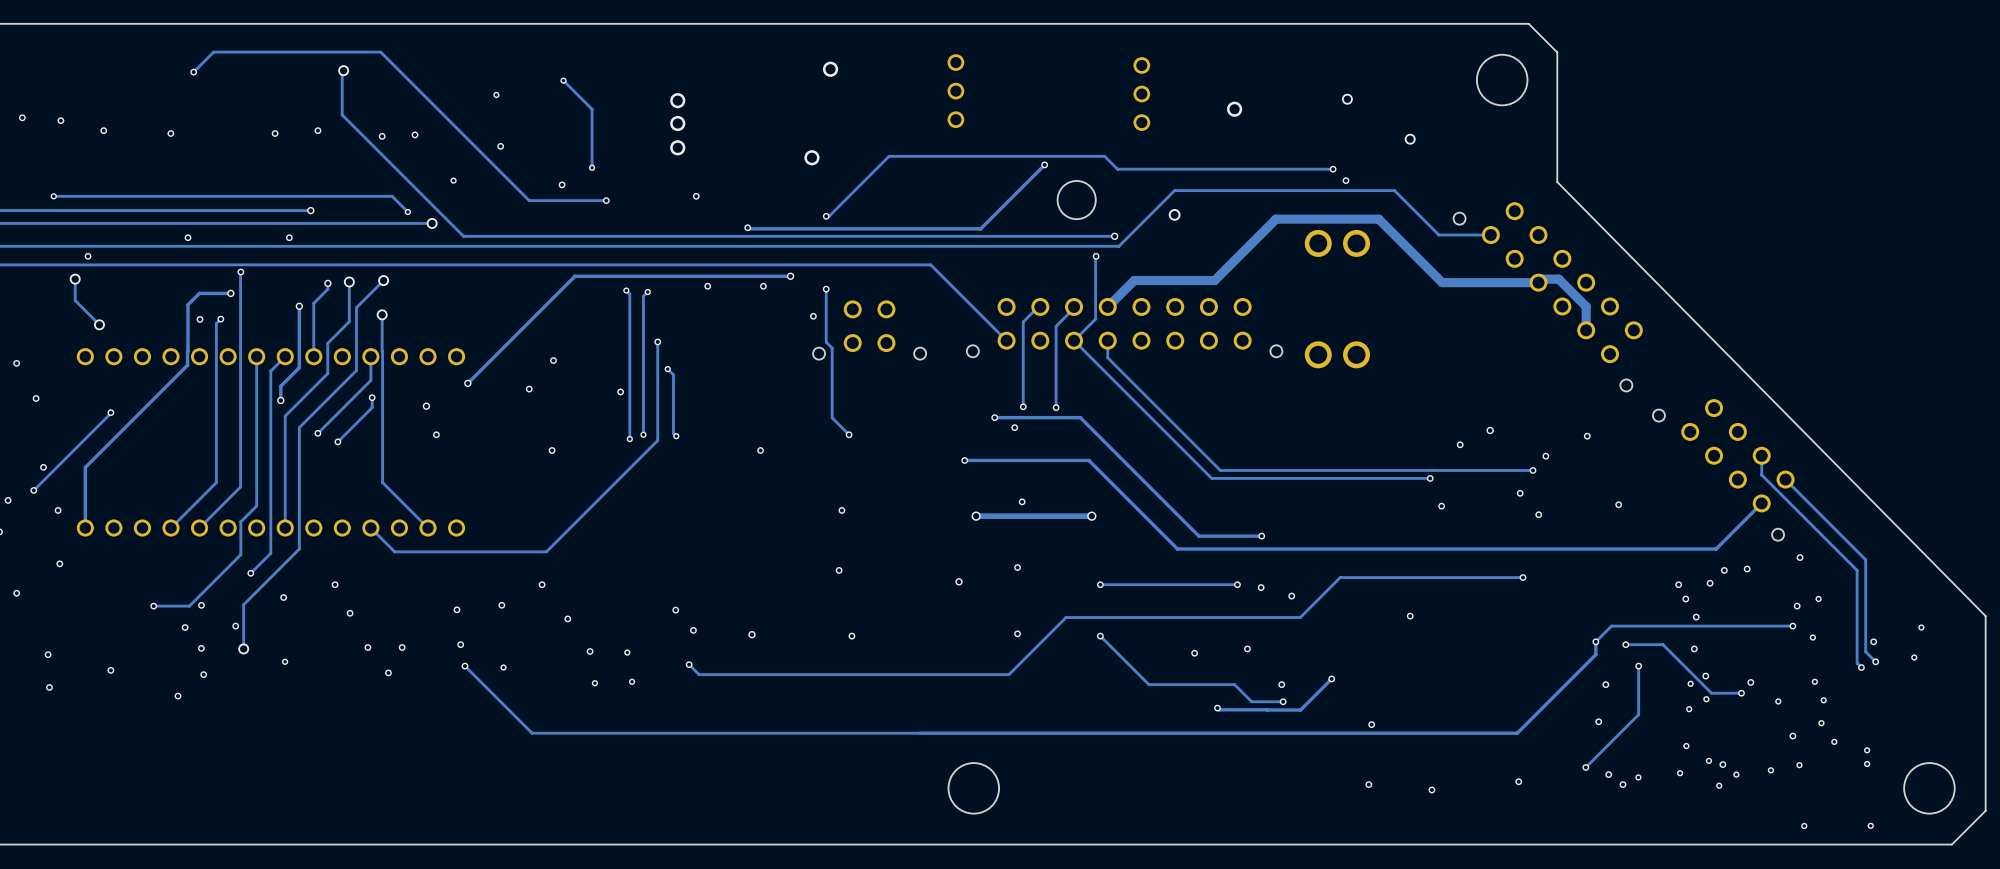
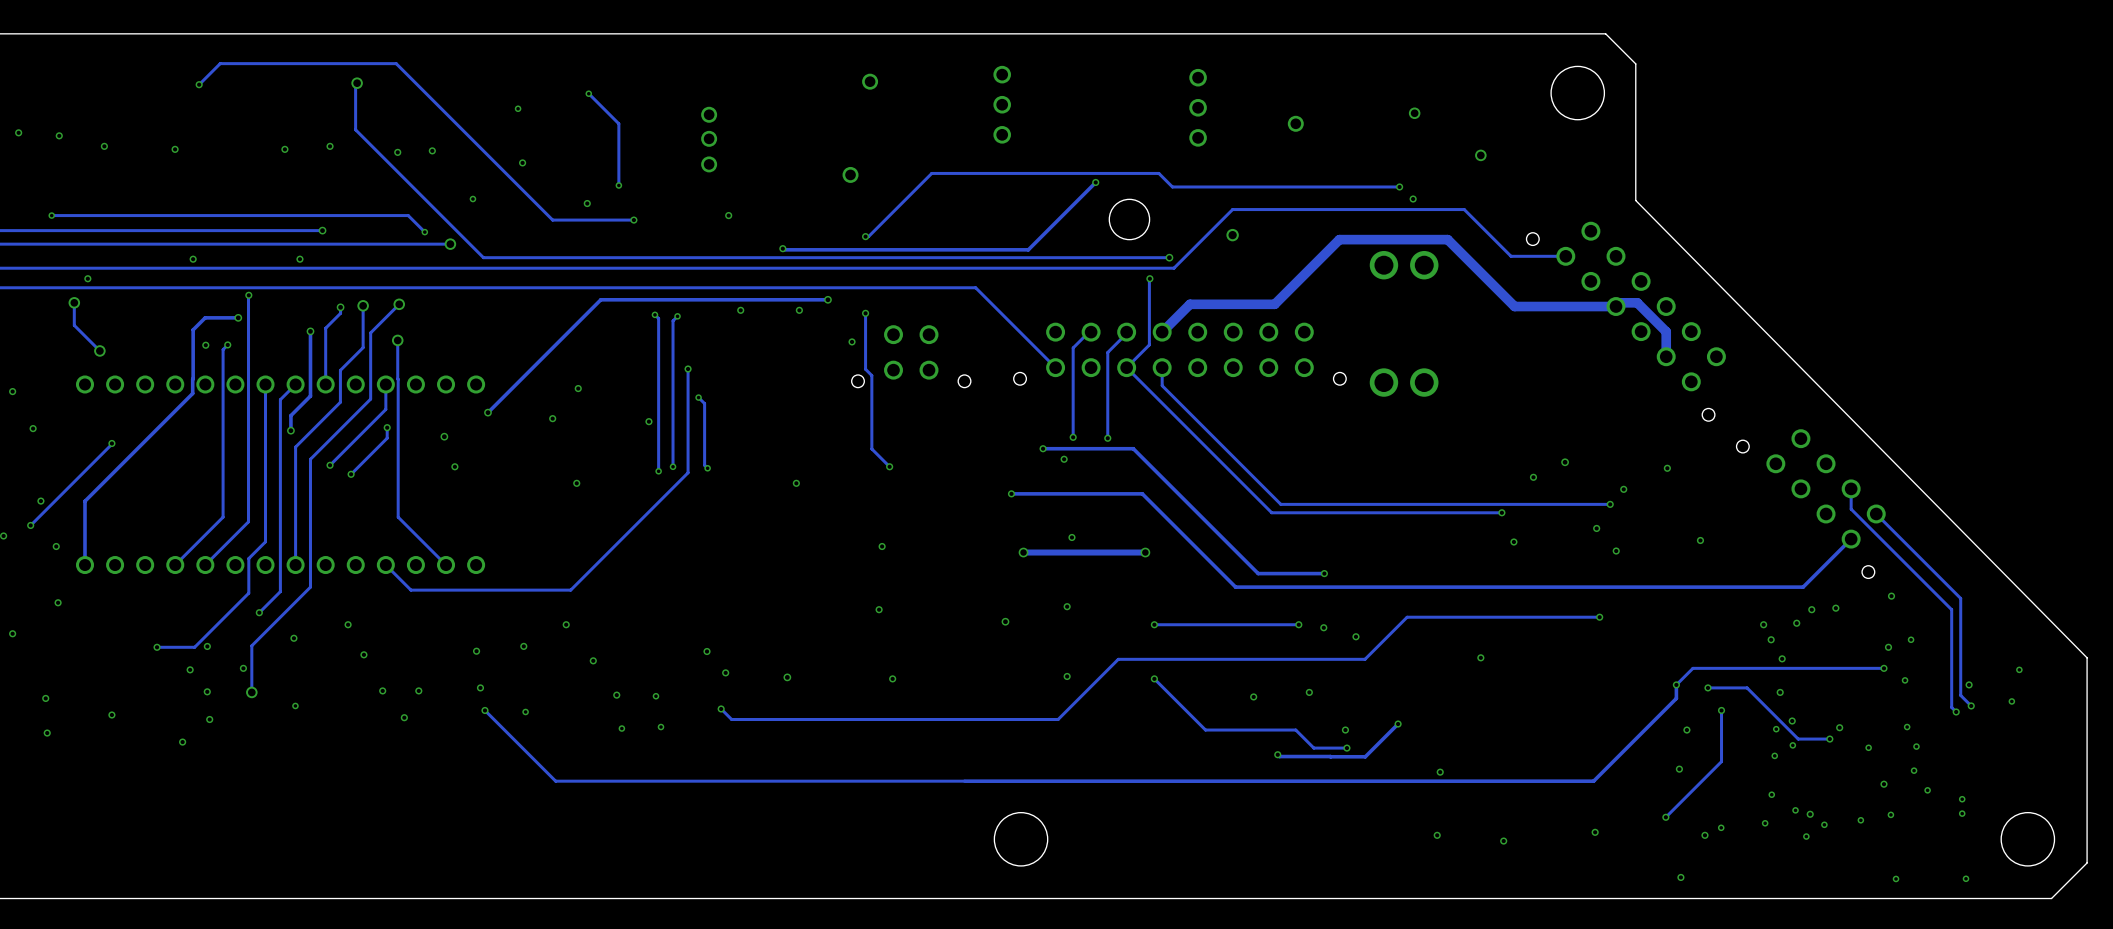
via position: (1608, 774) -> (1680, 877)

